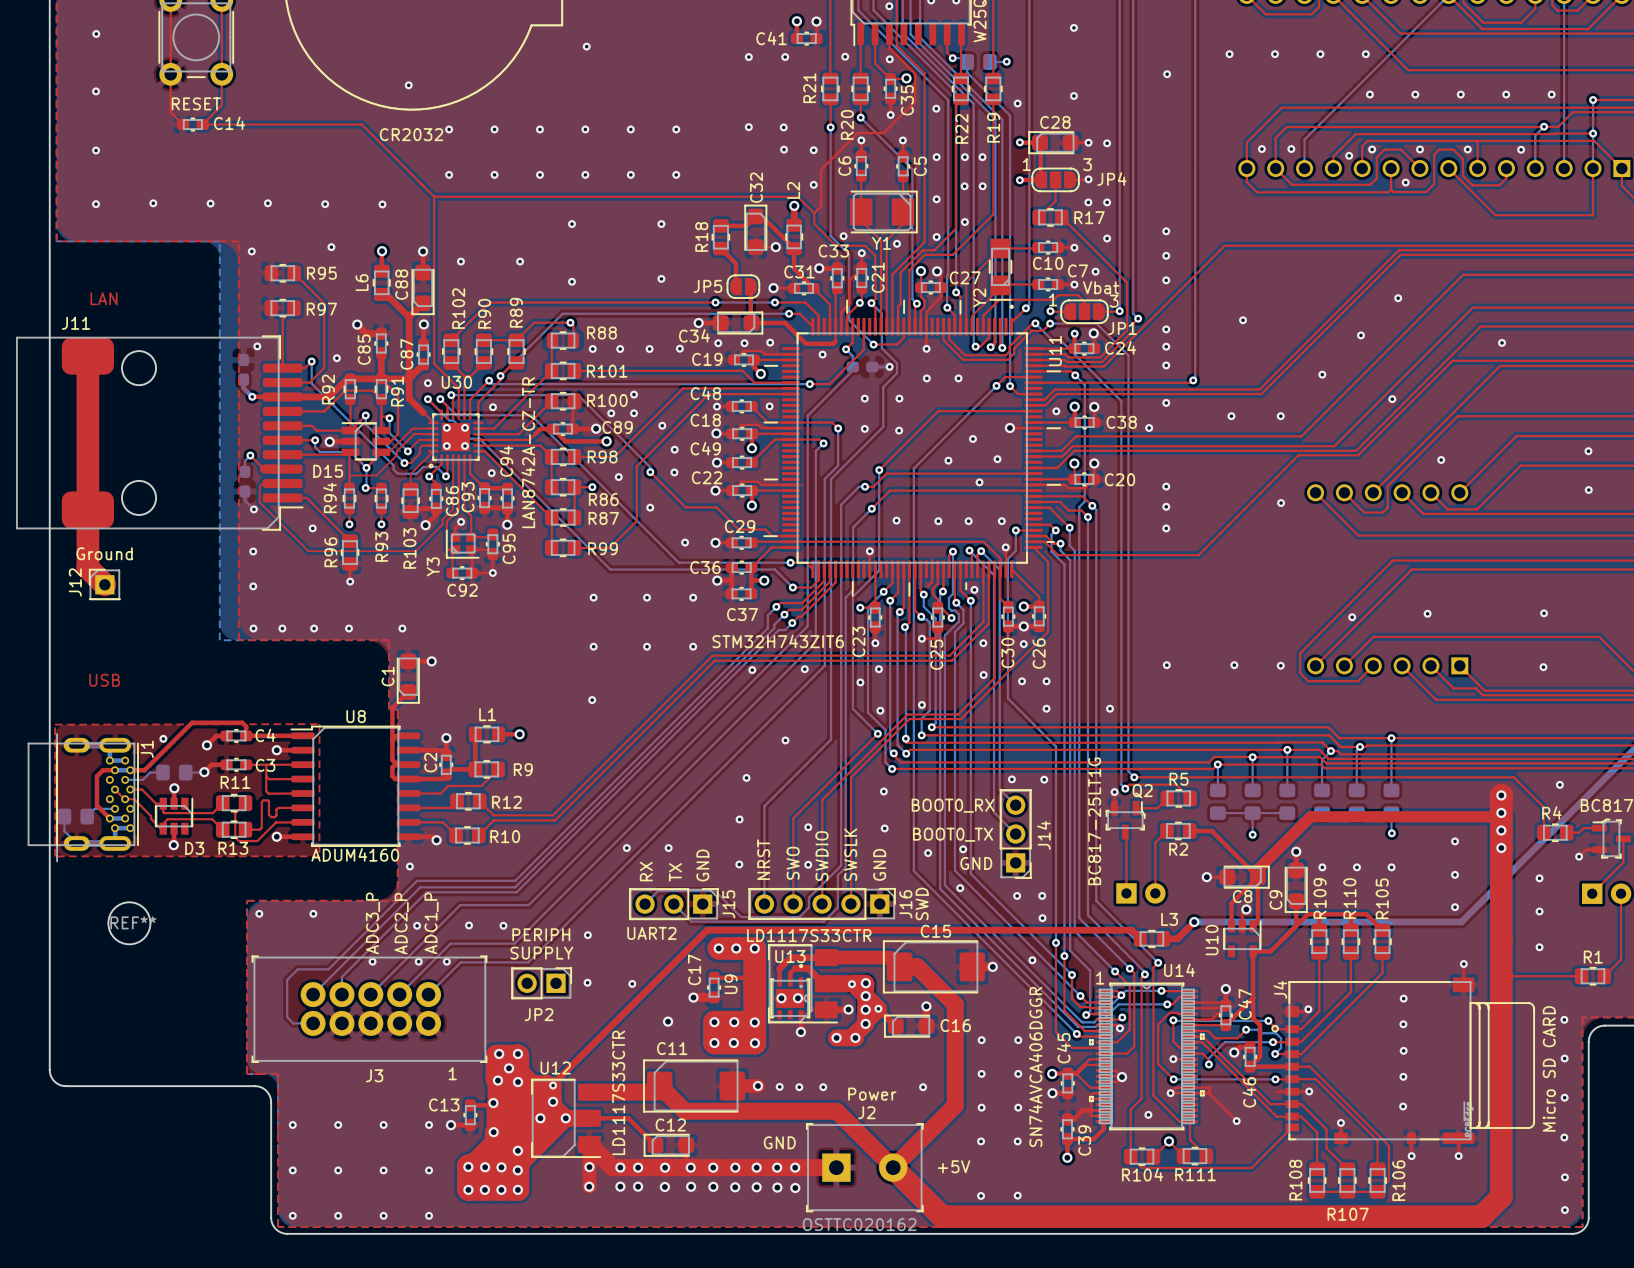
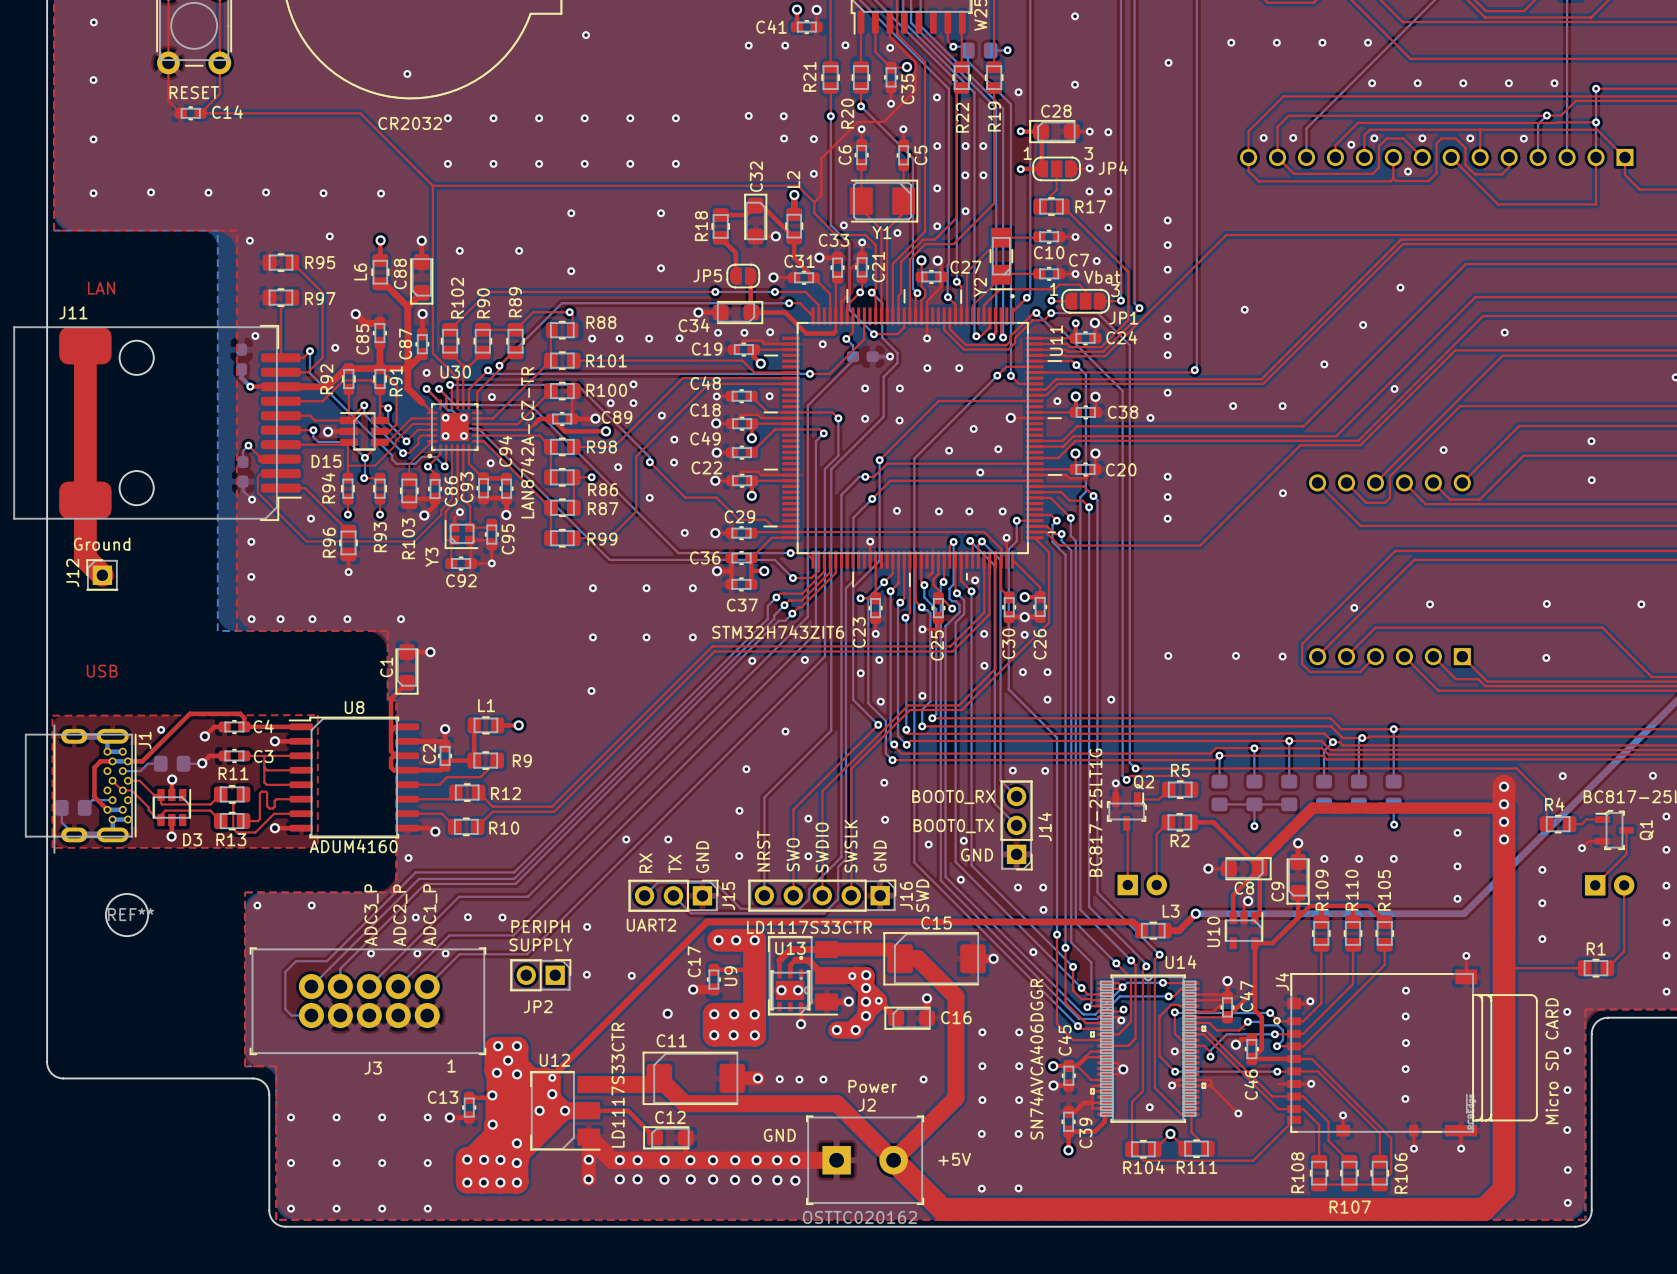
text: 1 (1100, 978) -> none

